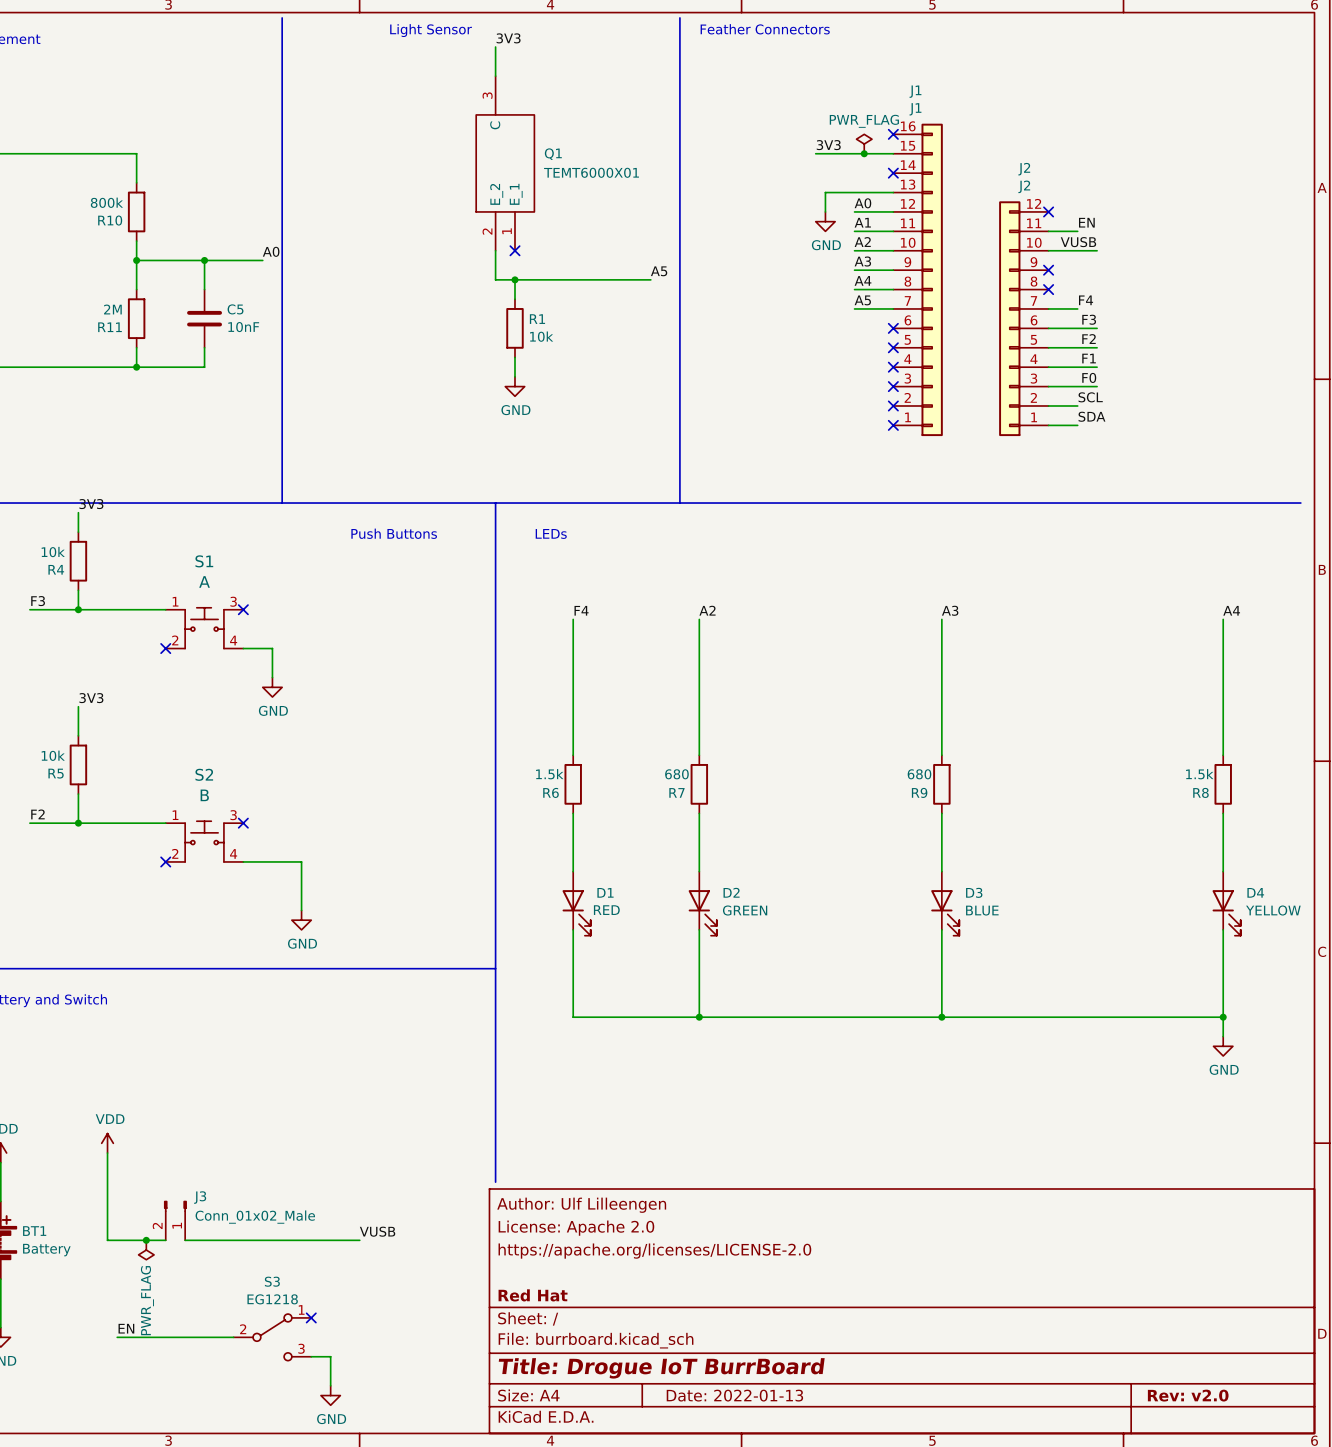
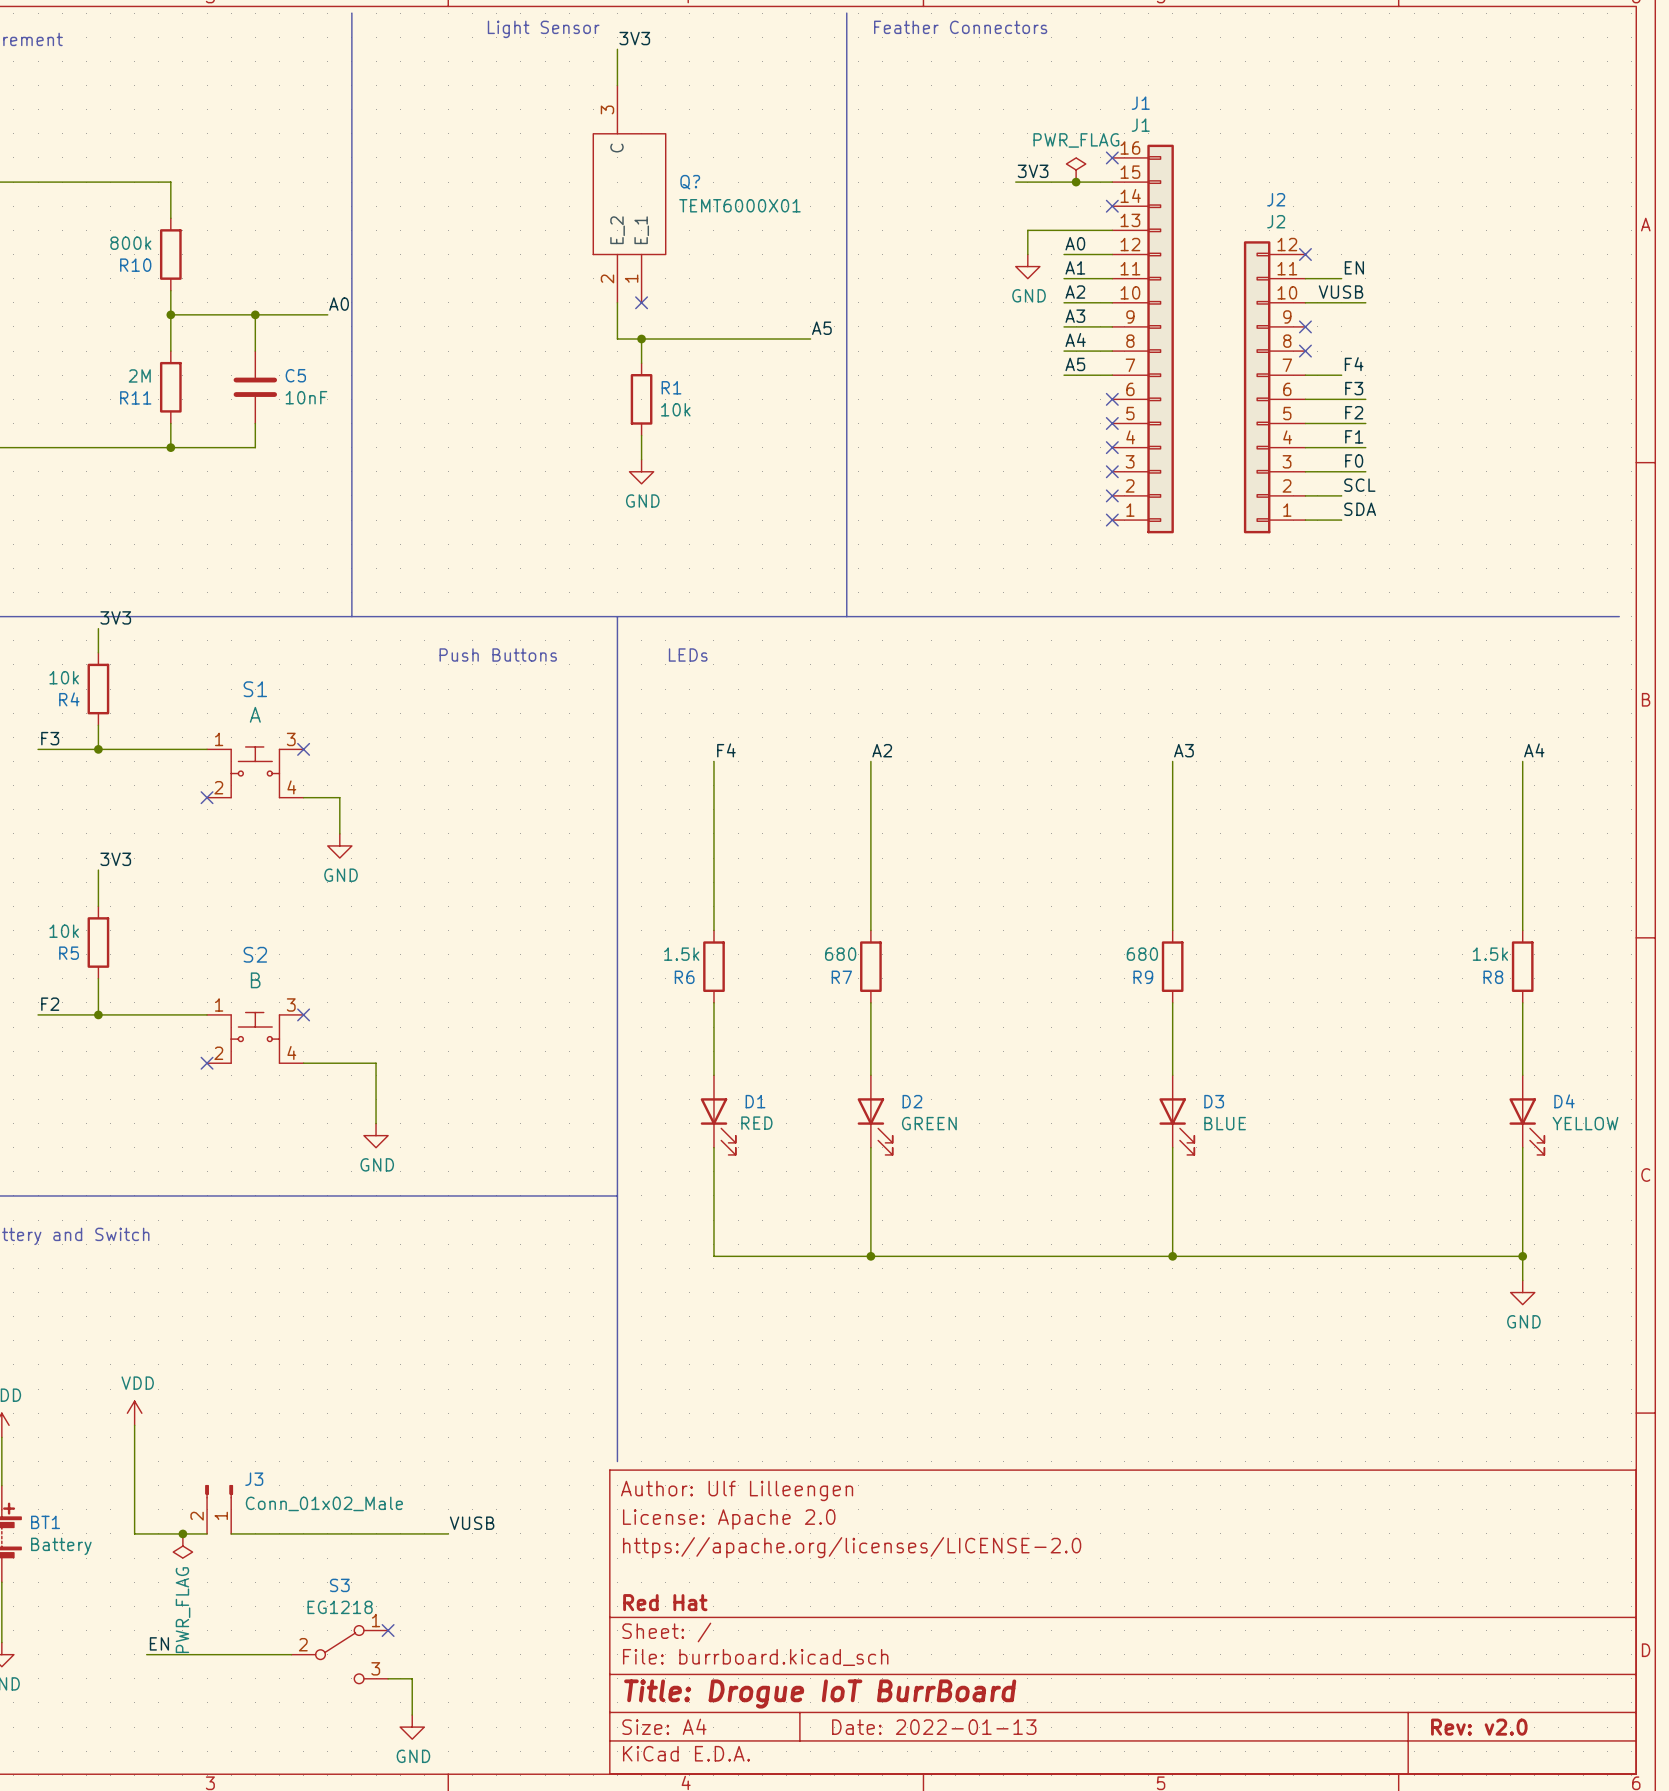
Q1 name: Q1 (553, 154) -> Q? (690, 182)

